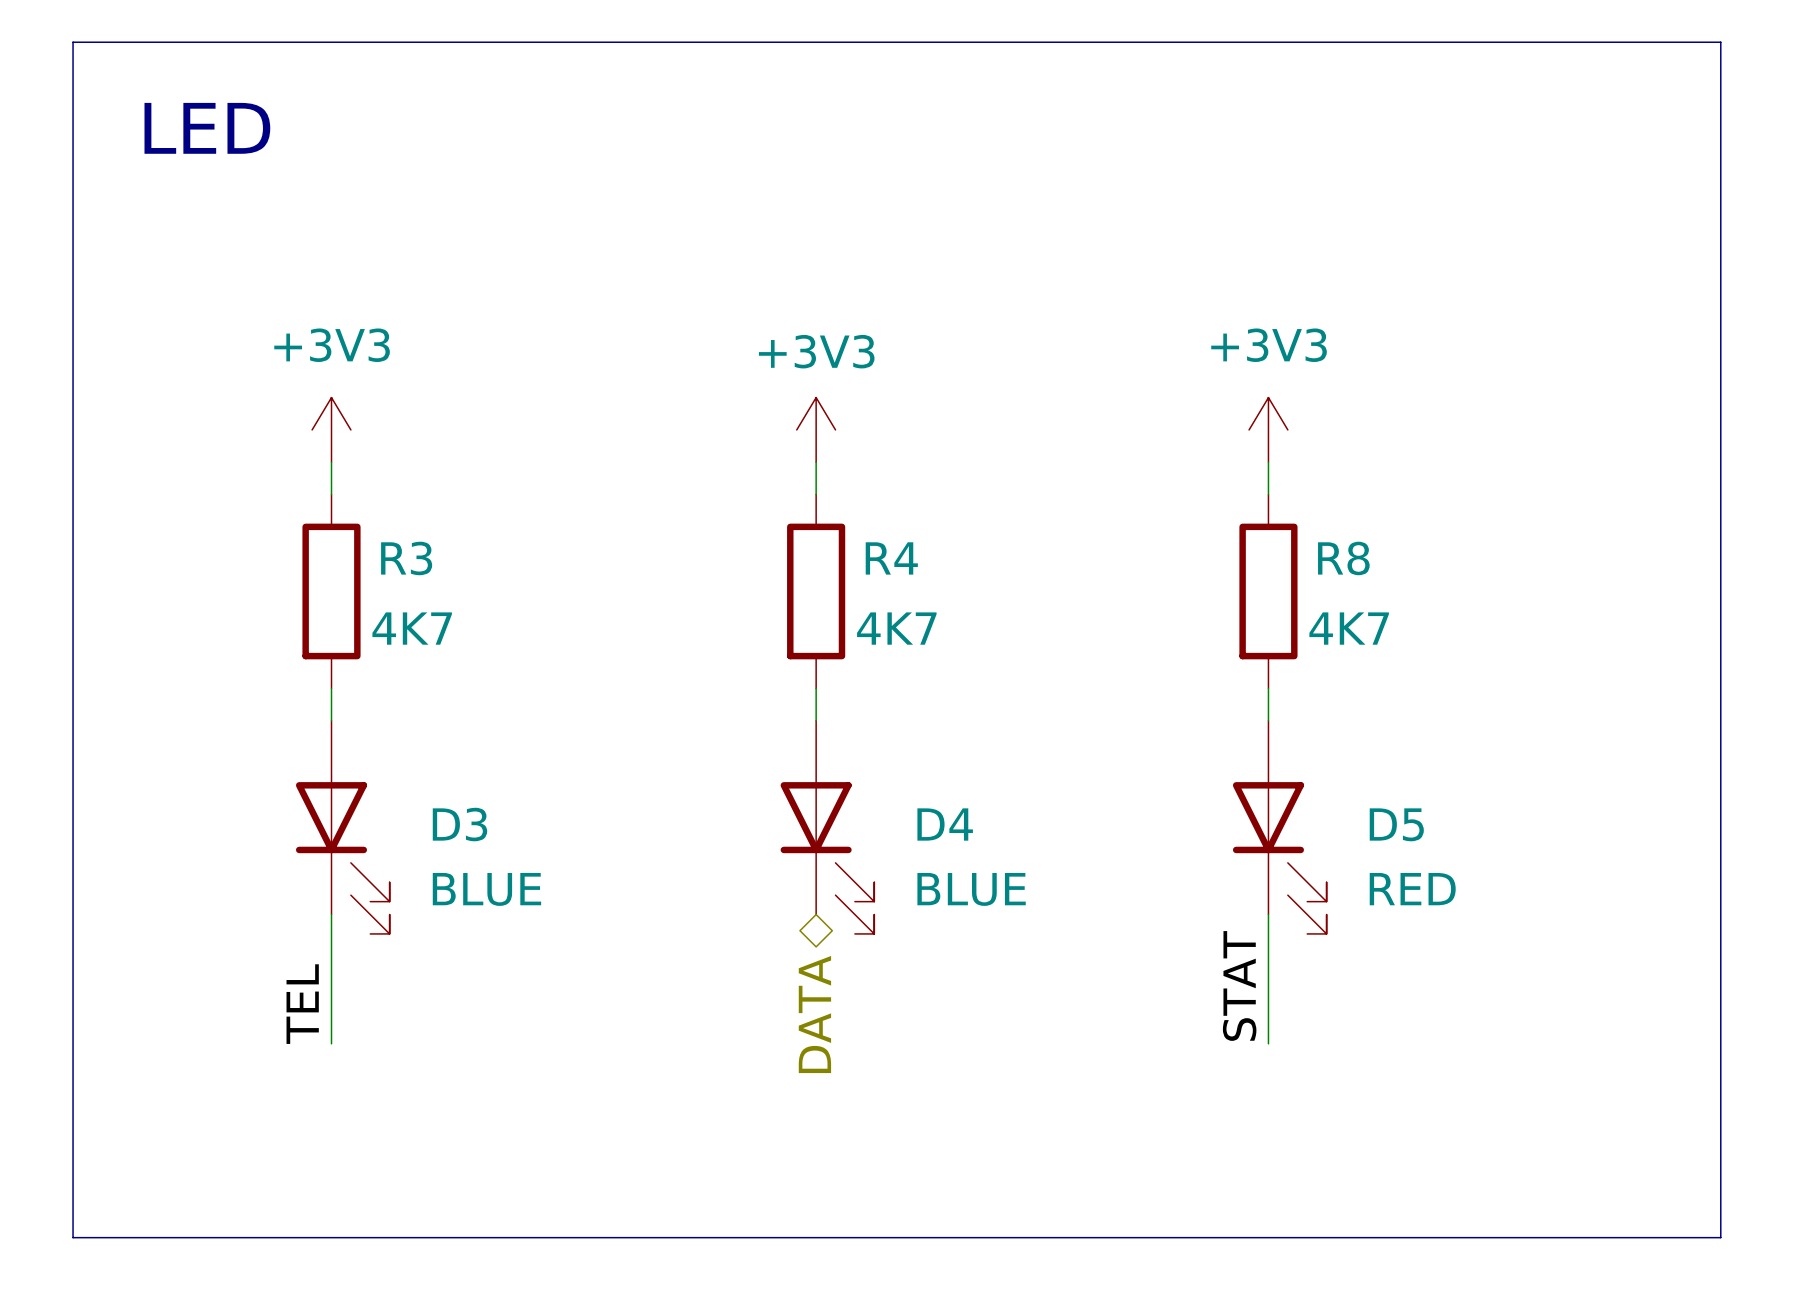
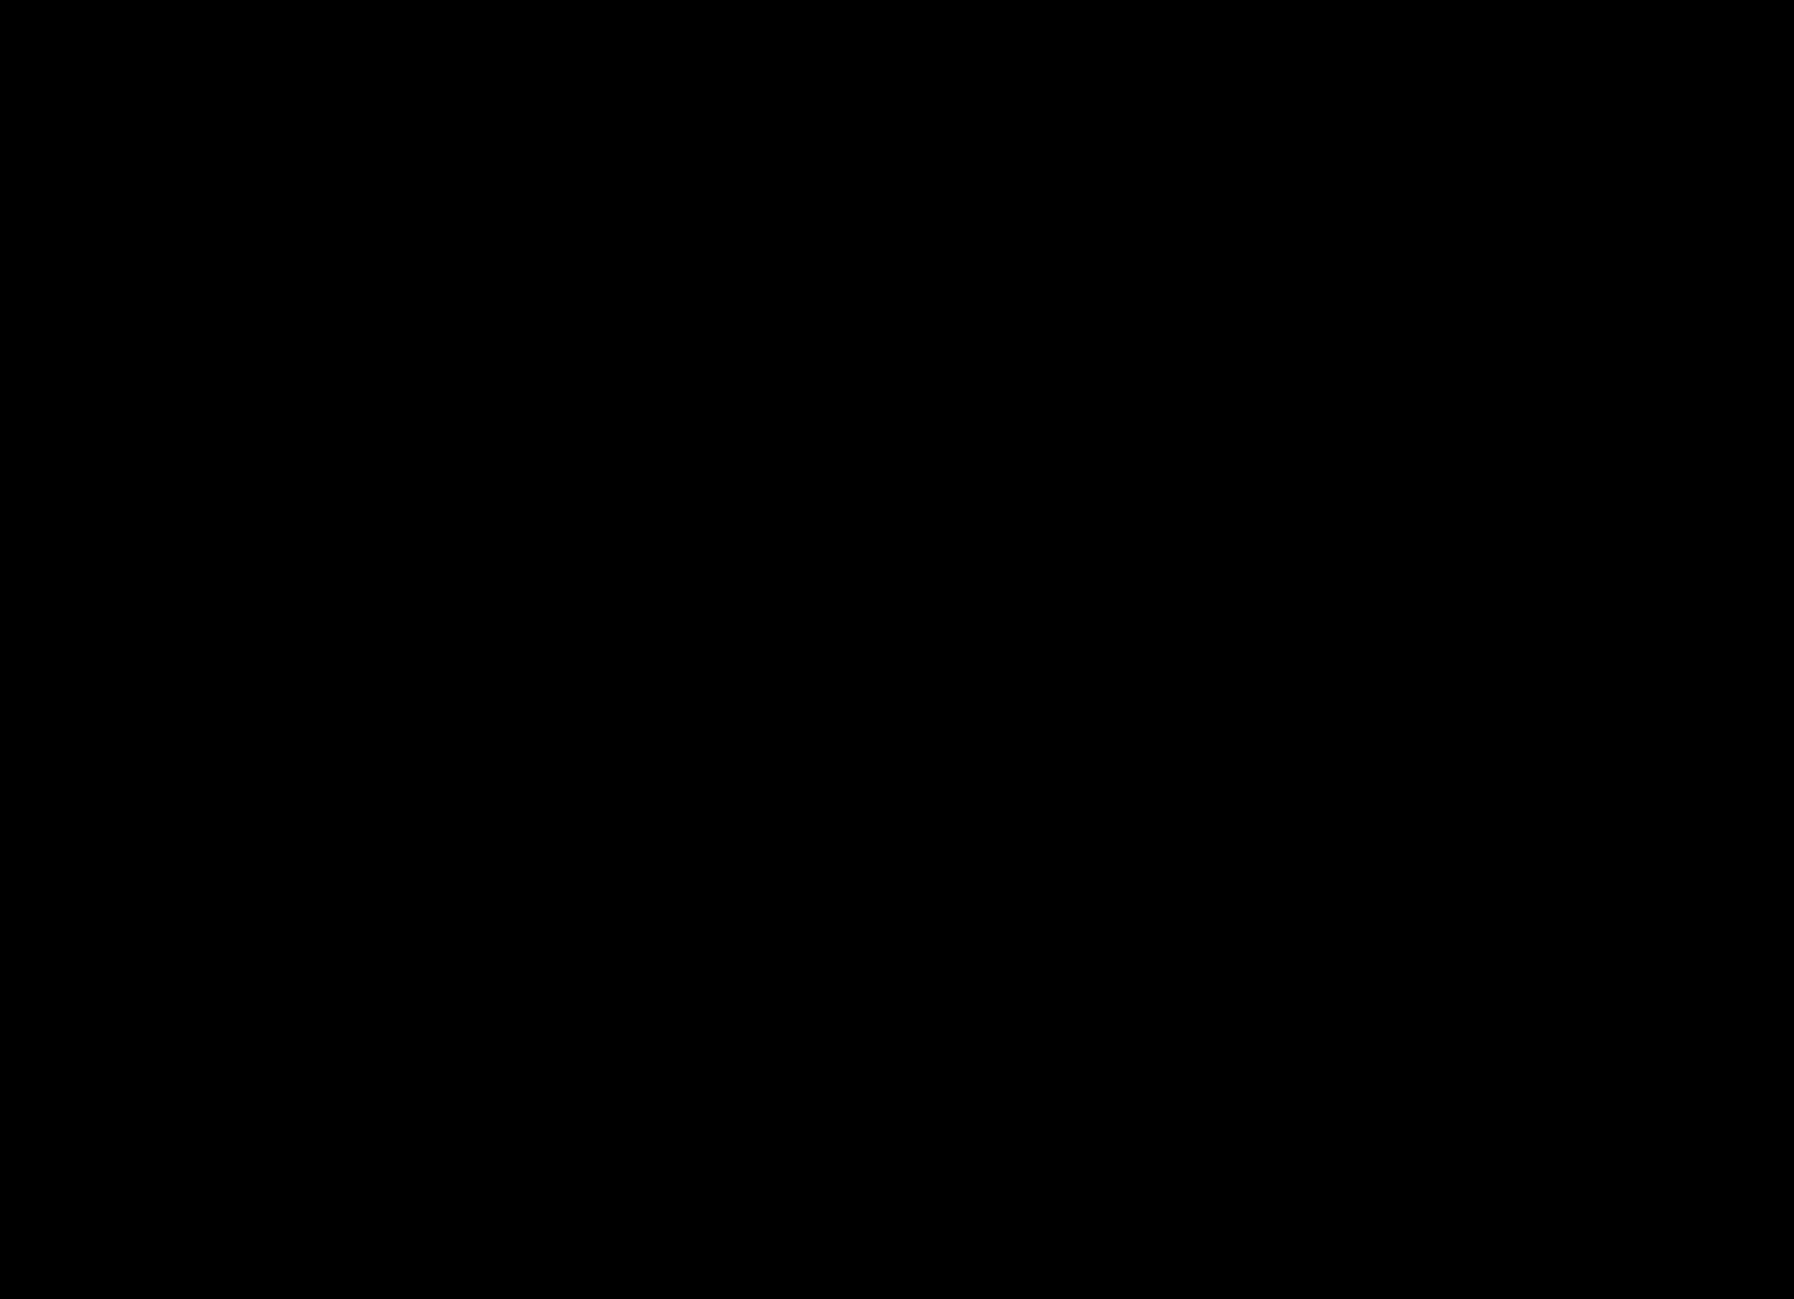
line: (73, 42) (1720, 42) (1720, 1237) (73, 1237) (73, 42) -> none
text: LED (207, 128) -> none
power symbol: +3V3 (331, 429) -> none
power symbol: +3V3 (816, 429) -> none
power symbol: +3V3 (1268, 429) -> none
wire: (331, 462) (331, 494) -> none
wire: (816, 462) (816, 494) -> none
wire: (1268, 462) (1268, 494) -> none
R3: 4K7 (331, 591) -> none
R4: 4K7 (816, 591) -> none
R8: 4K7 (1268, 591) -> none
wire: (331, 688) (331, 720) -> none
wire: (816, 688) (816, 720) -> none
wire: (1268, 688) (1268, 720) -> none
D3: BLUE (342, 827) -> none
D4: BLUE (827, 827) -> none
D5: RED (1279, 827) -> none
wire: (331, 914) (331, 1043) -> none
wire: (1268, 914) (1268, 1043) -> none
label: STAT (1239, 985) -> none
label: TEL (302, 1004) -> none
hierarchical label: DATA (814, 1014) -> none

